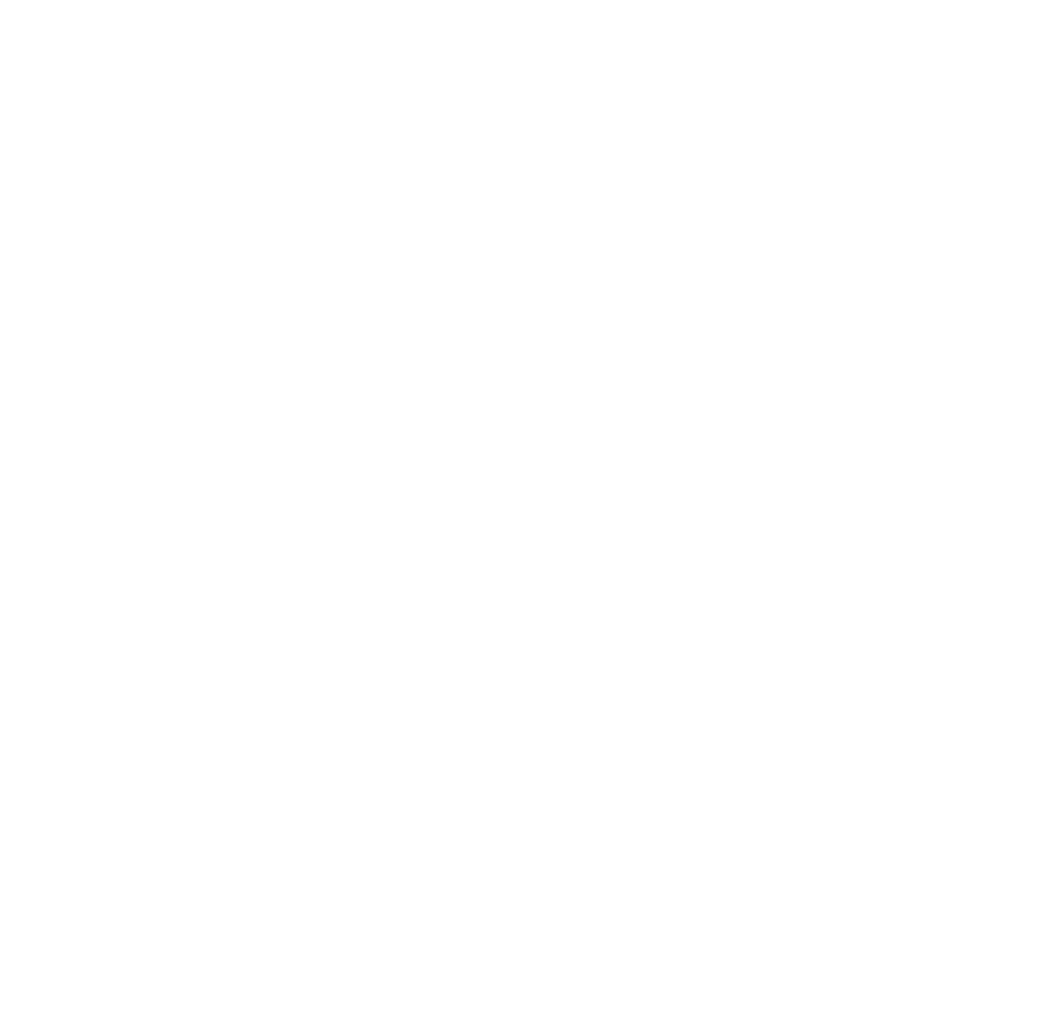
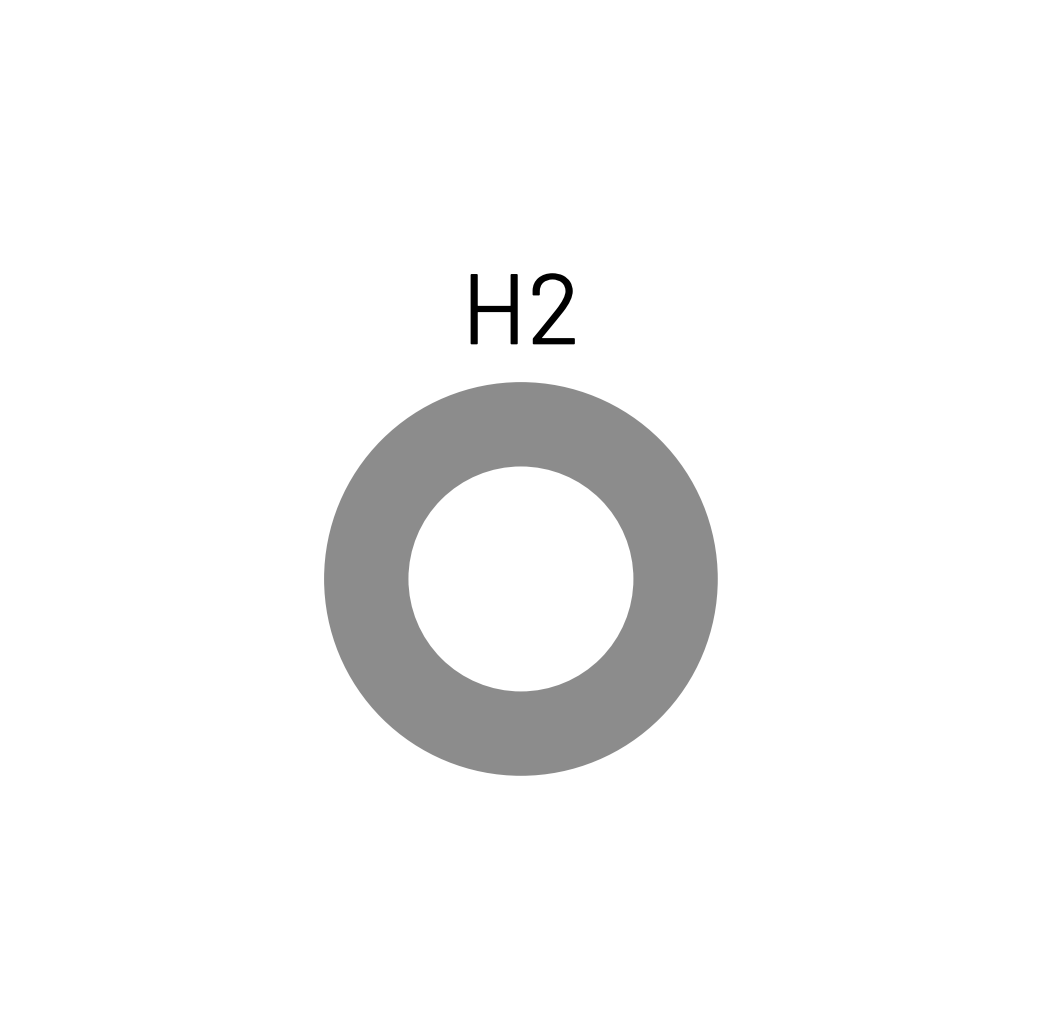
H2: none -> (520, 578)

